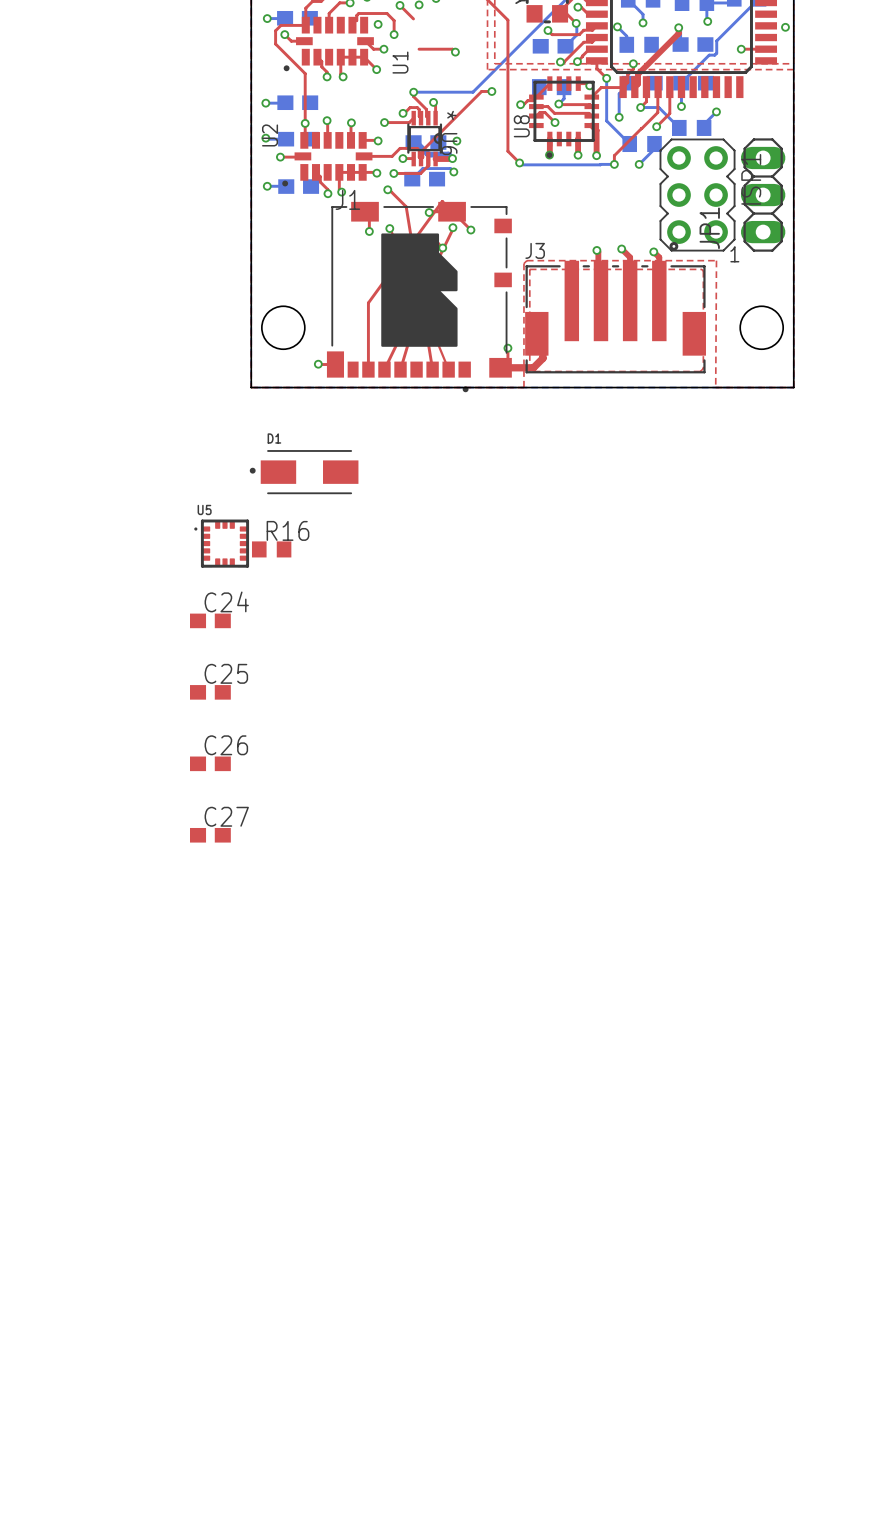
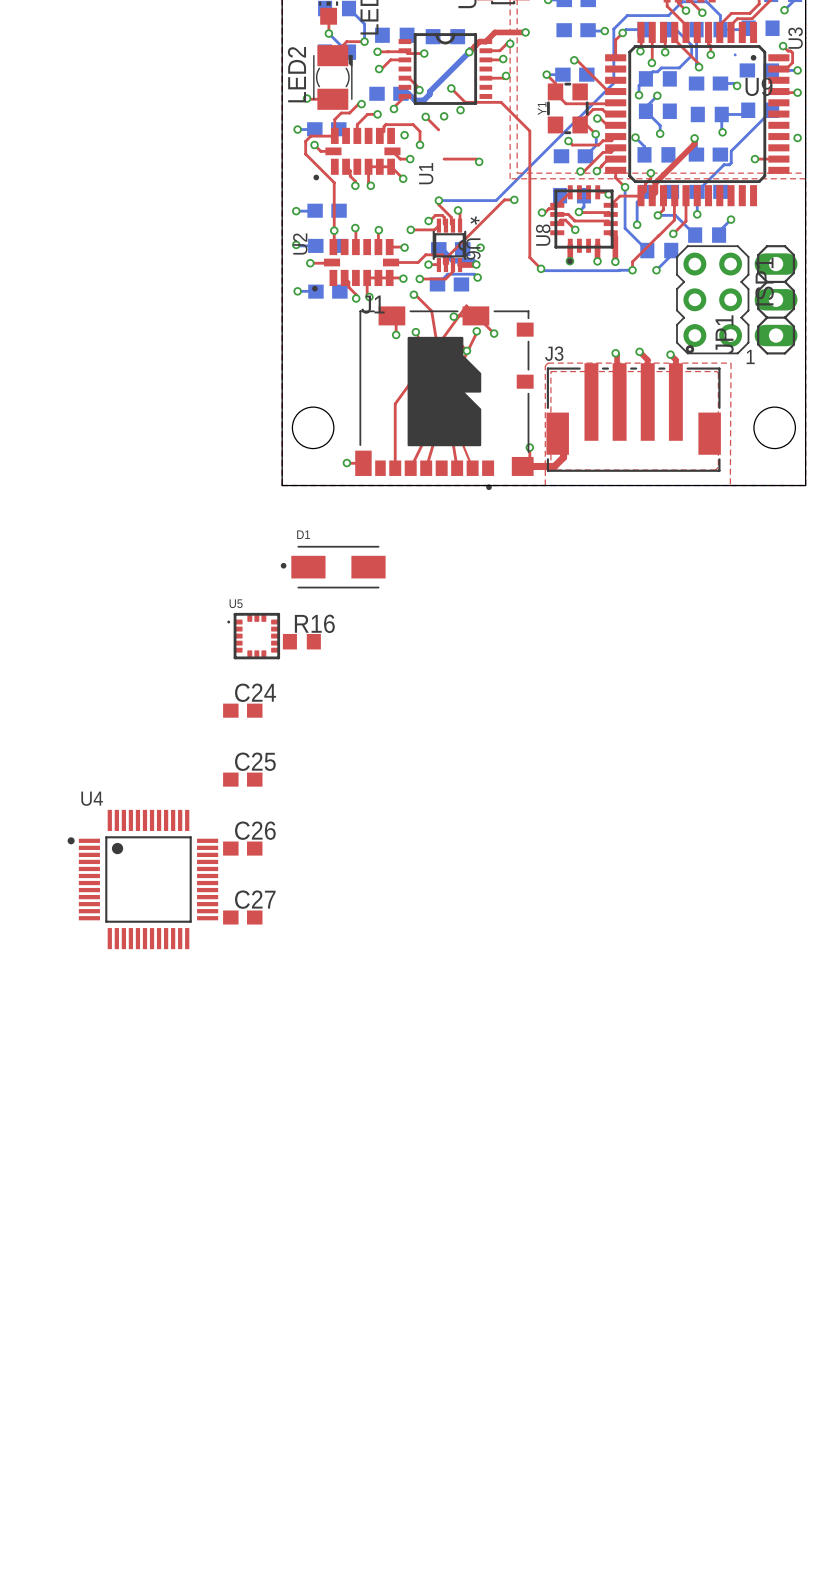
U4: none -> (142, 879)

